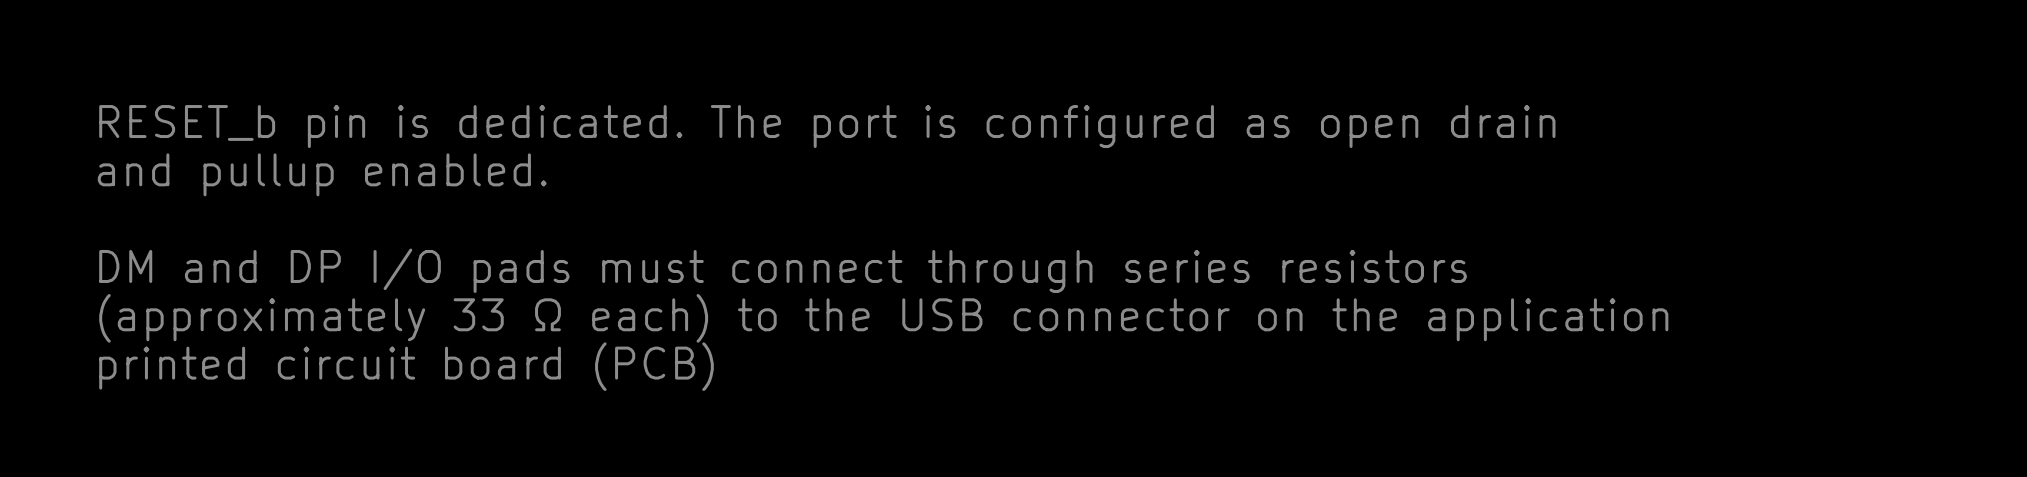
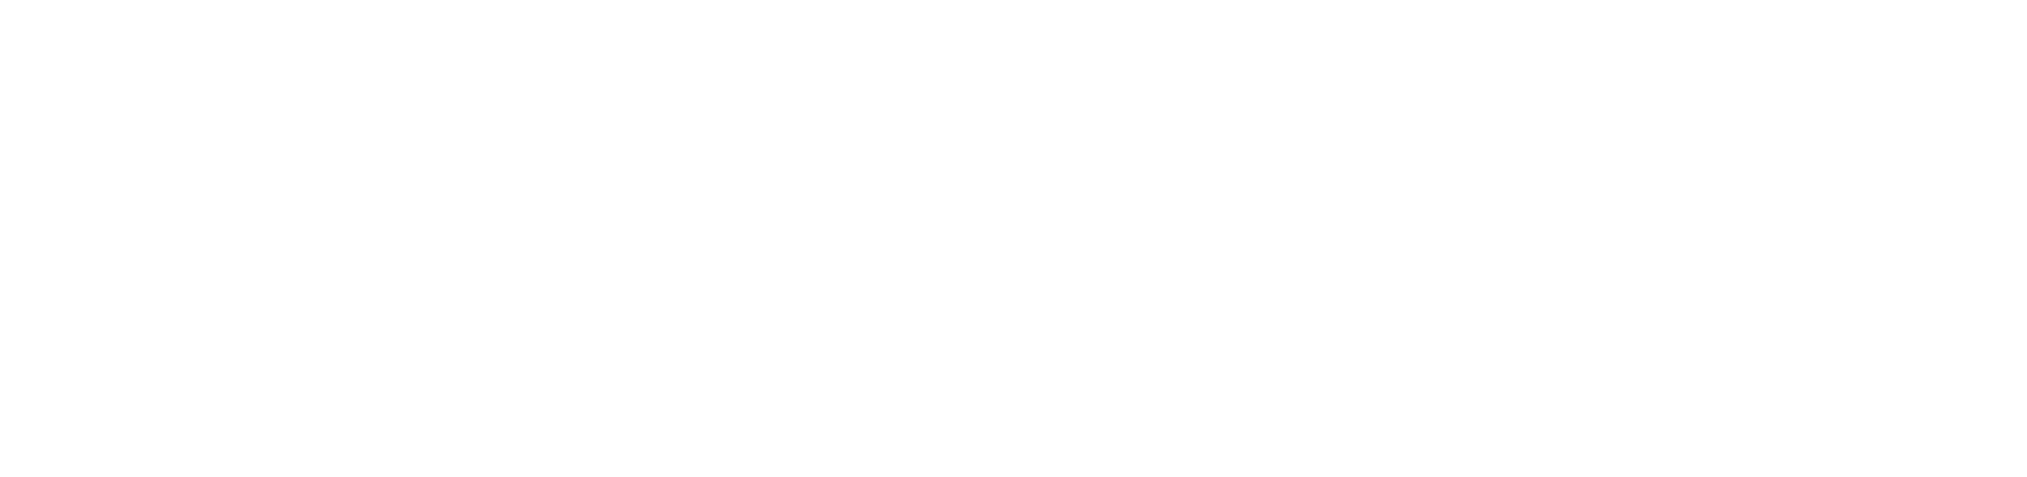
text: RESET_b pin is dedicated. The port is configured as open drain (827, 126) -> none
text: and pullup enabled. (322, 174) -> none
text: DM and DP I/O pads must connect through series resistors (783, 270) -> none
text: (approximately 33 Ω each) to the USB connector on the application (883, 318) -> none
text: printed circuit board (PCB) (406, 366) -> none

